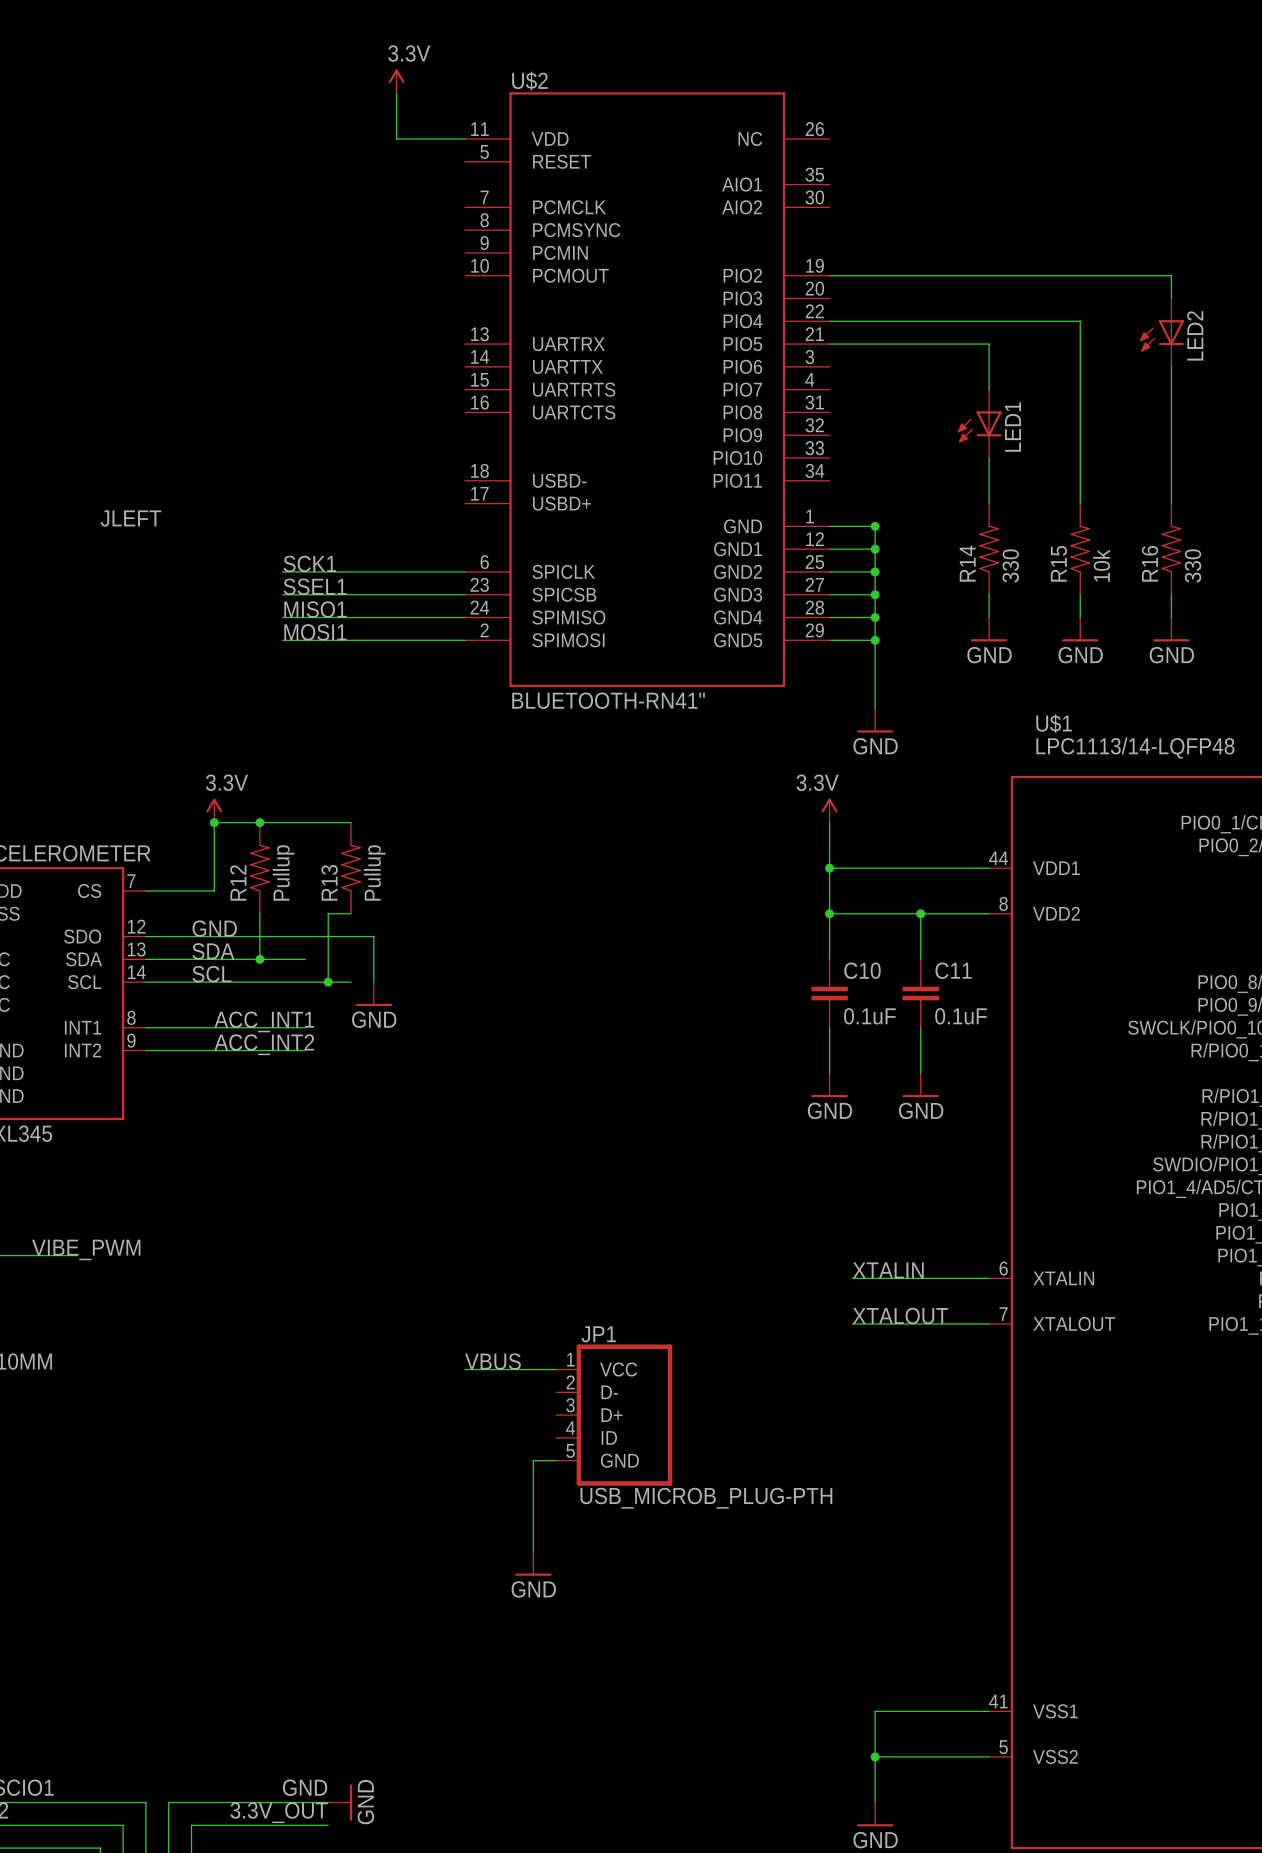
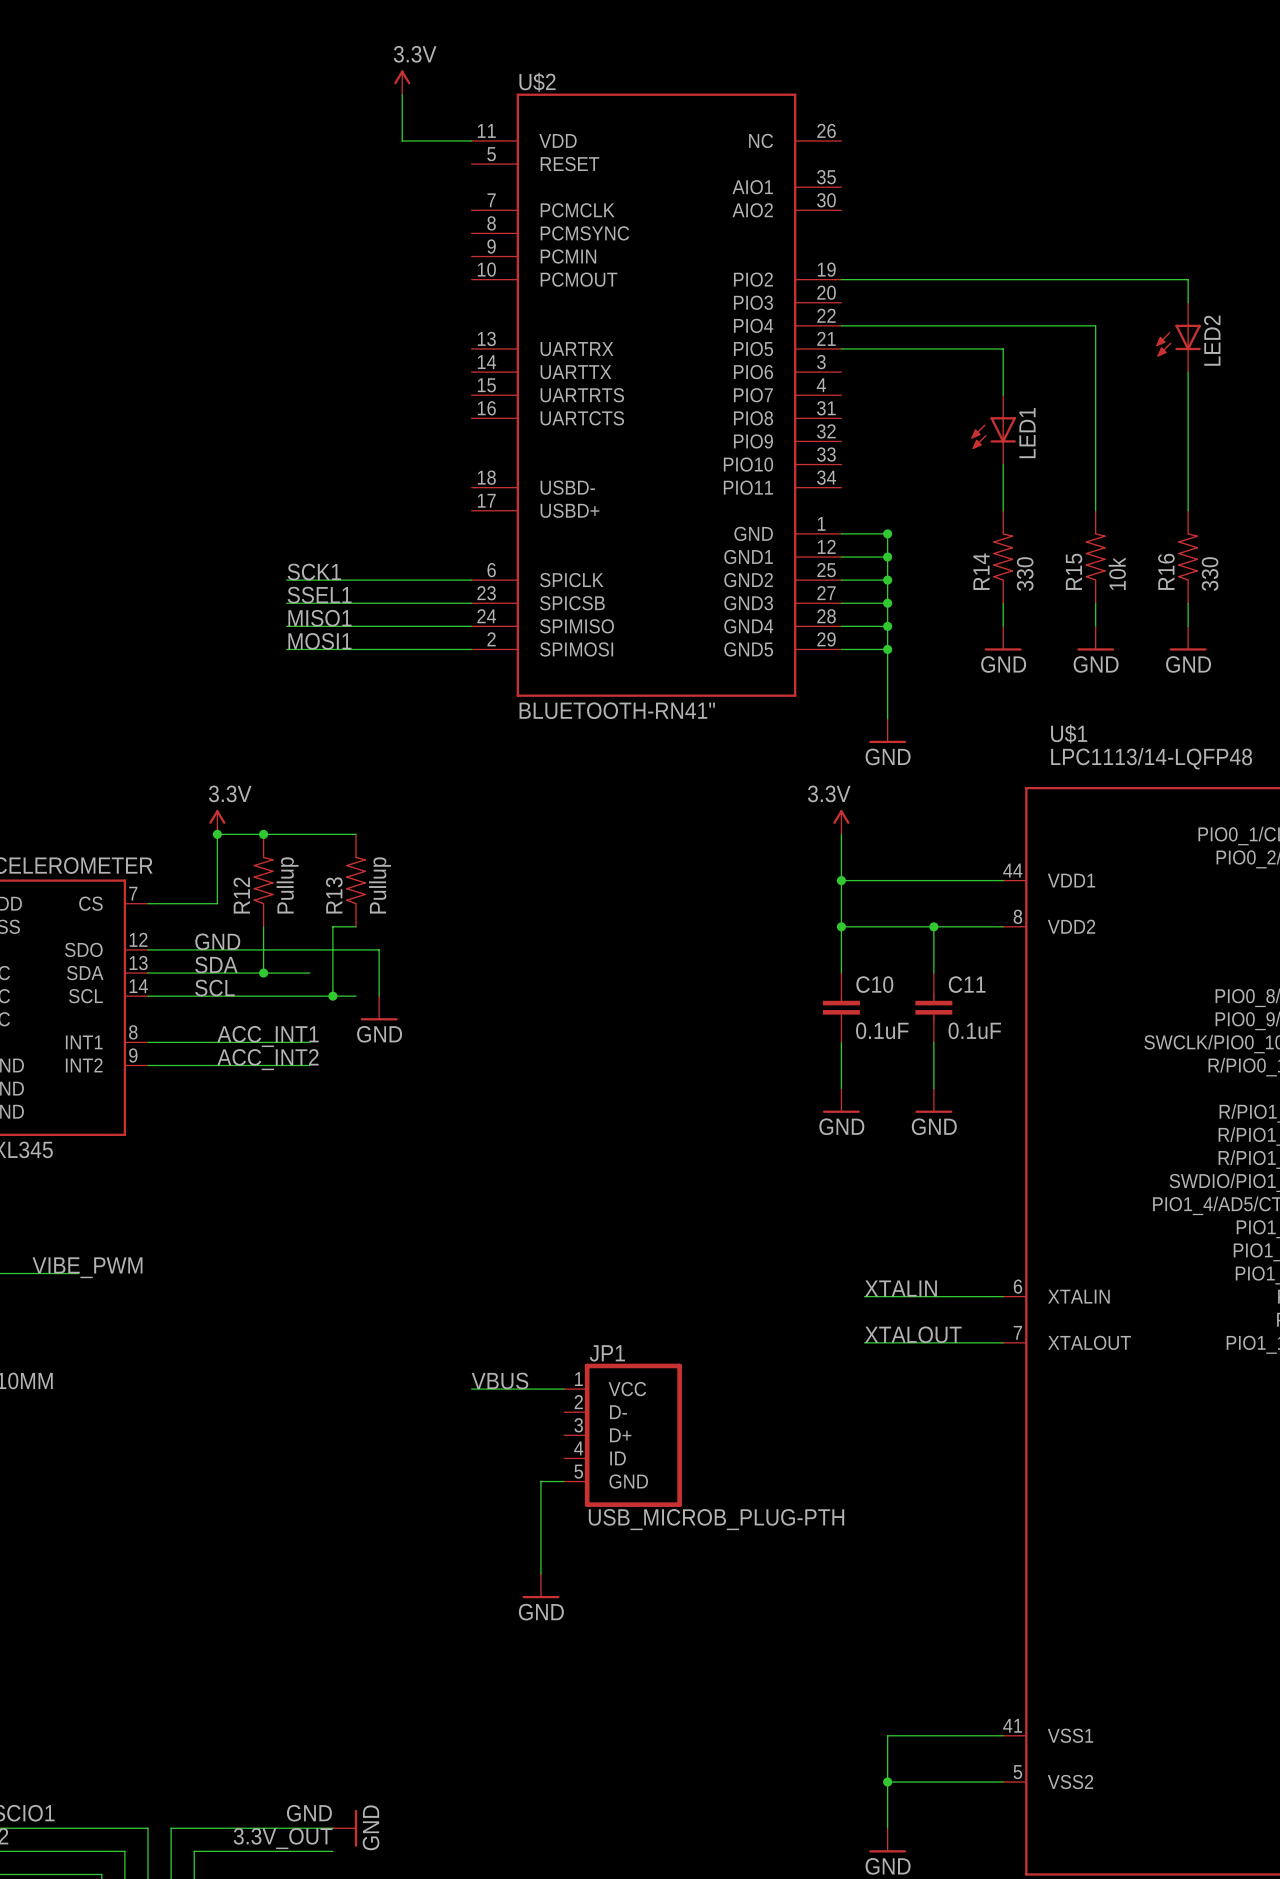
label: JLEFT (131, 518) -> none

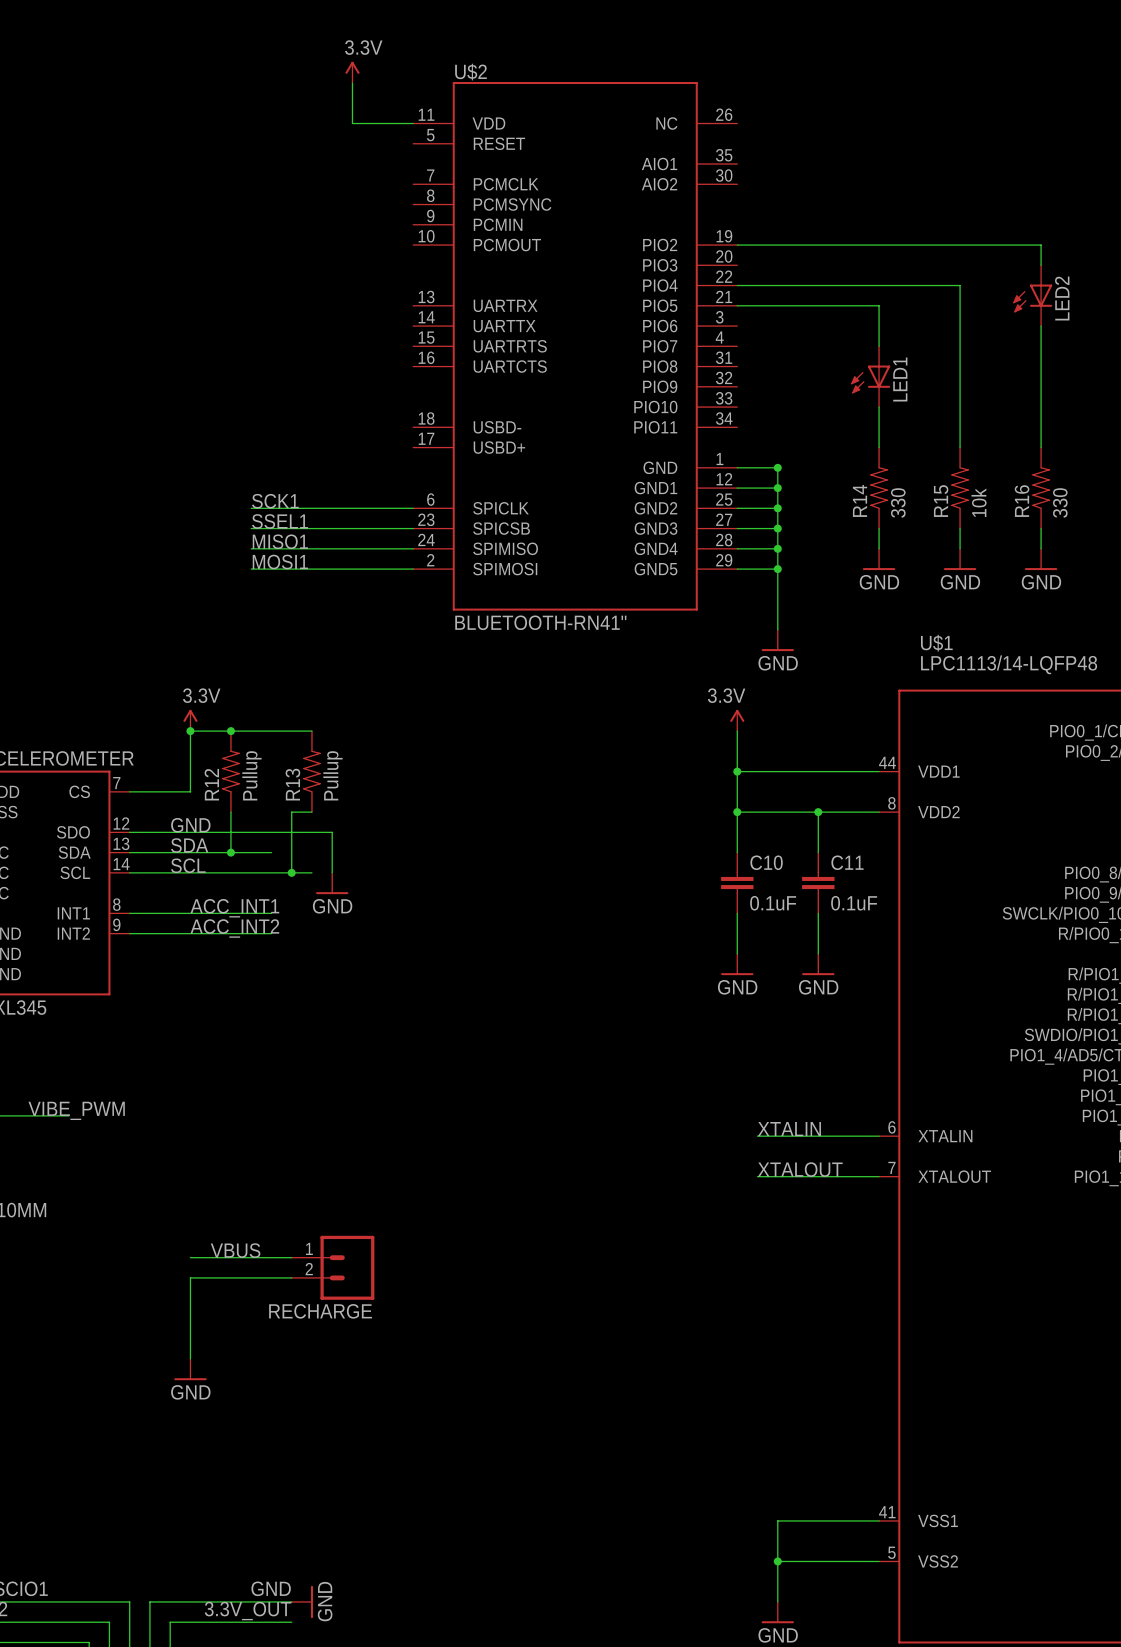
label: VBUS (499, 1380) -> none
wire: (471, 1389) (564, 1389) -> none
label: none -> VBUS (235, 1250)
wire: none -> (190, 1257) (291, 1257)
JP1: USB_MICROB_PLUG-PTH (622, 1435) -> none
RECHARGE: none -> (333, 1267)
wire: none -> (291, 1277) (190, 1277) (190, 1358)
wire: (564, 1481) (540, 1481) (540, 1573) -> none
power symbol: none -> GND (190, 1369)
power symbol: GND (540, 1586) -> none

